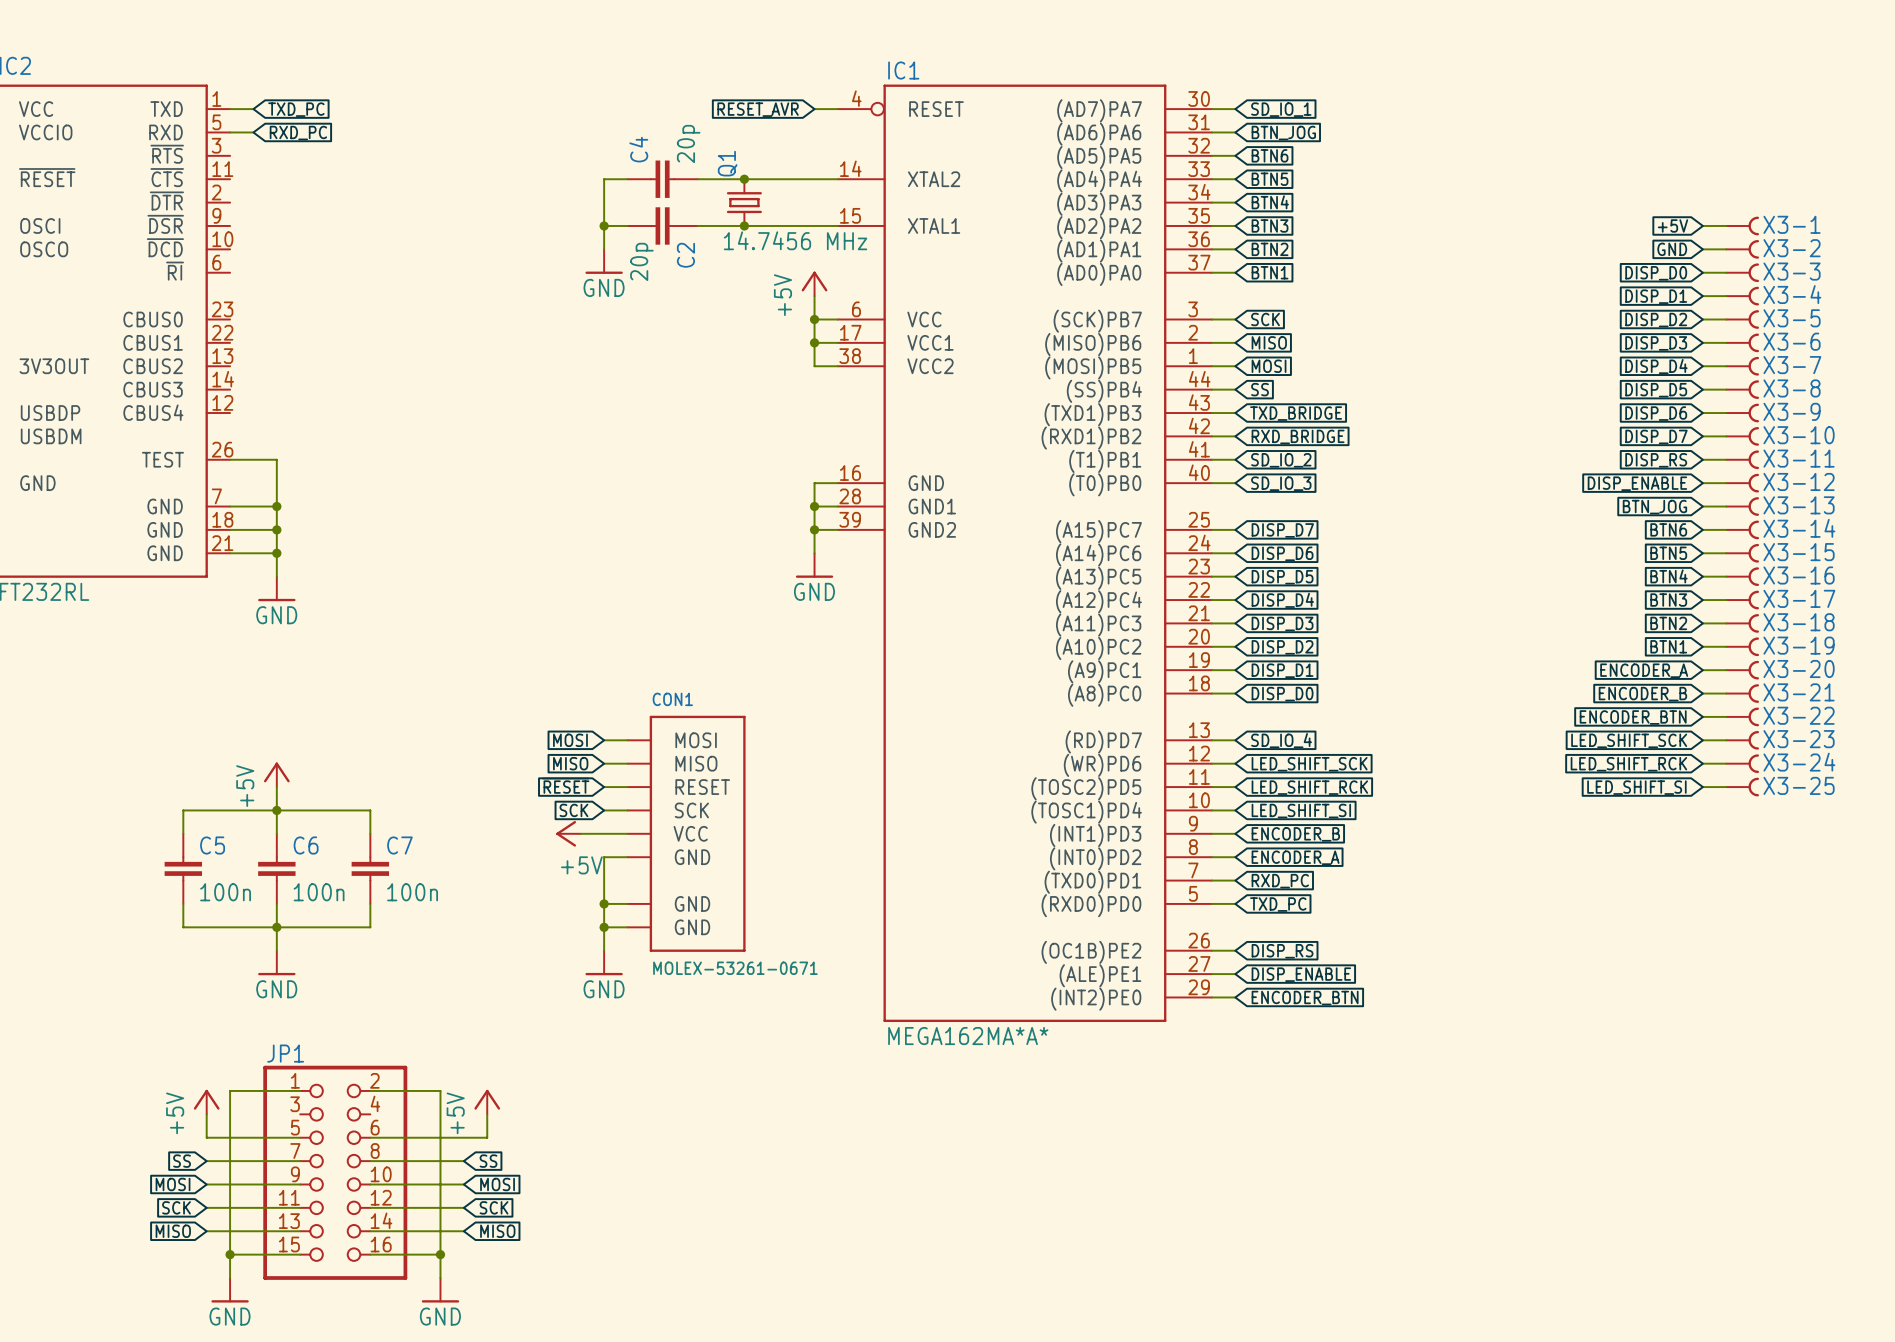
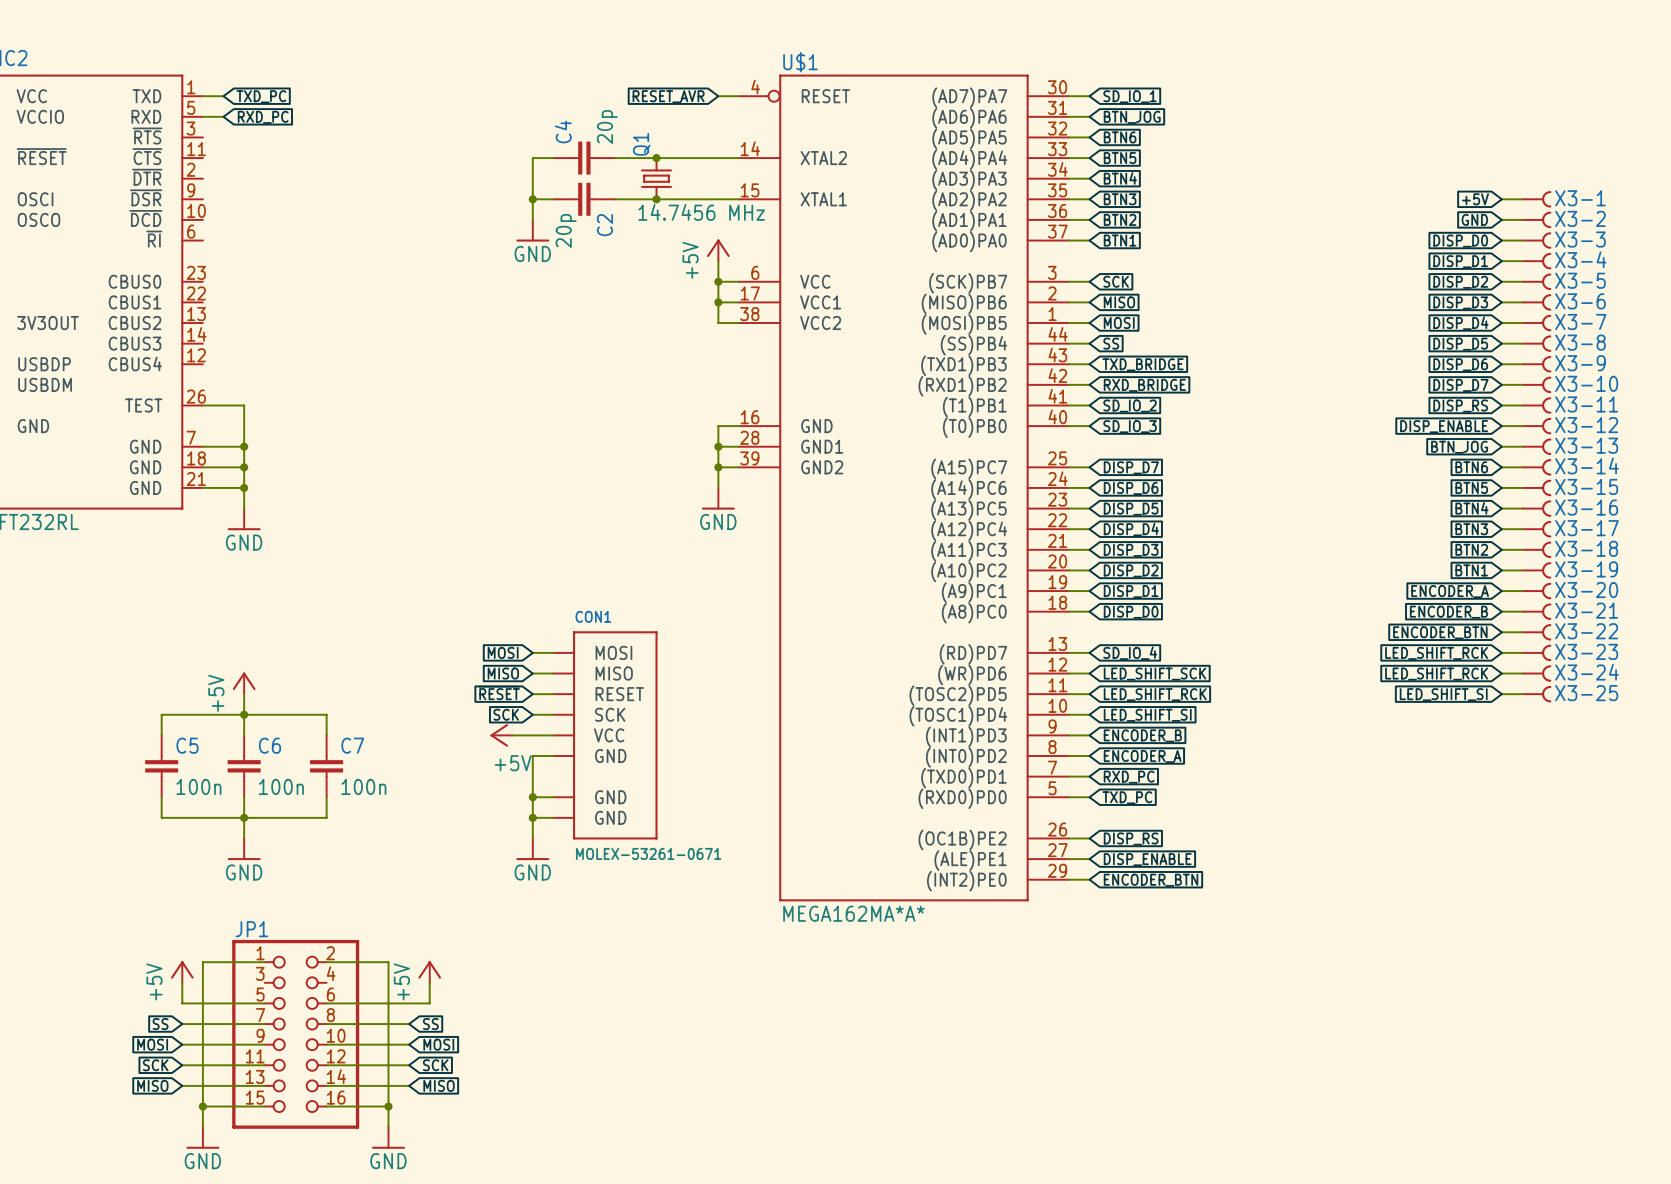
IC1 name: IC1 (903, 70) -> U$1 (800, 62)
global label: LED_SHIFT_SCK (1629, 740) -> LED_SHIFT_RCK (1436, 653)

